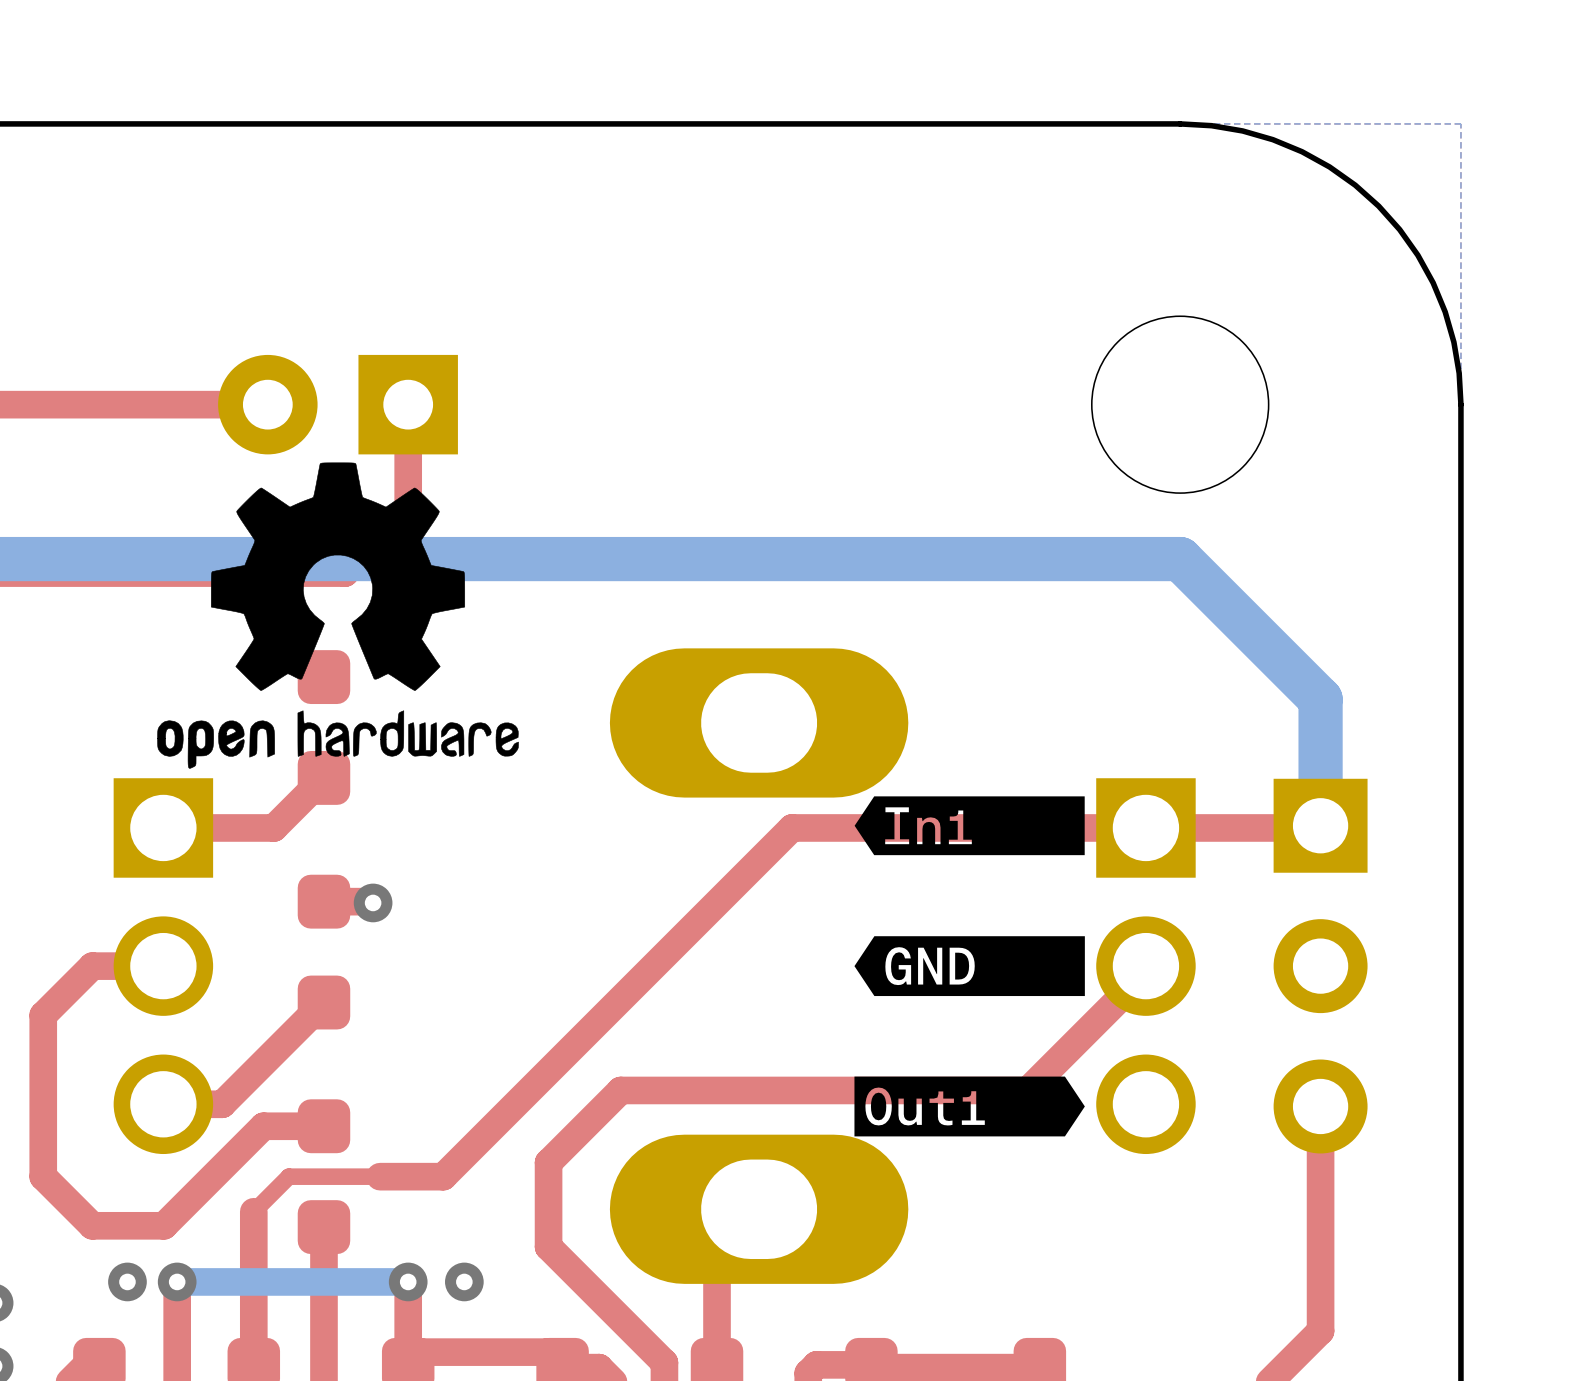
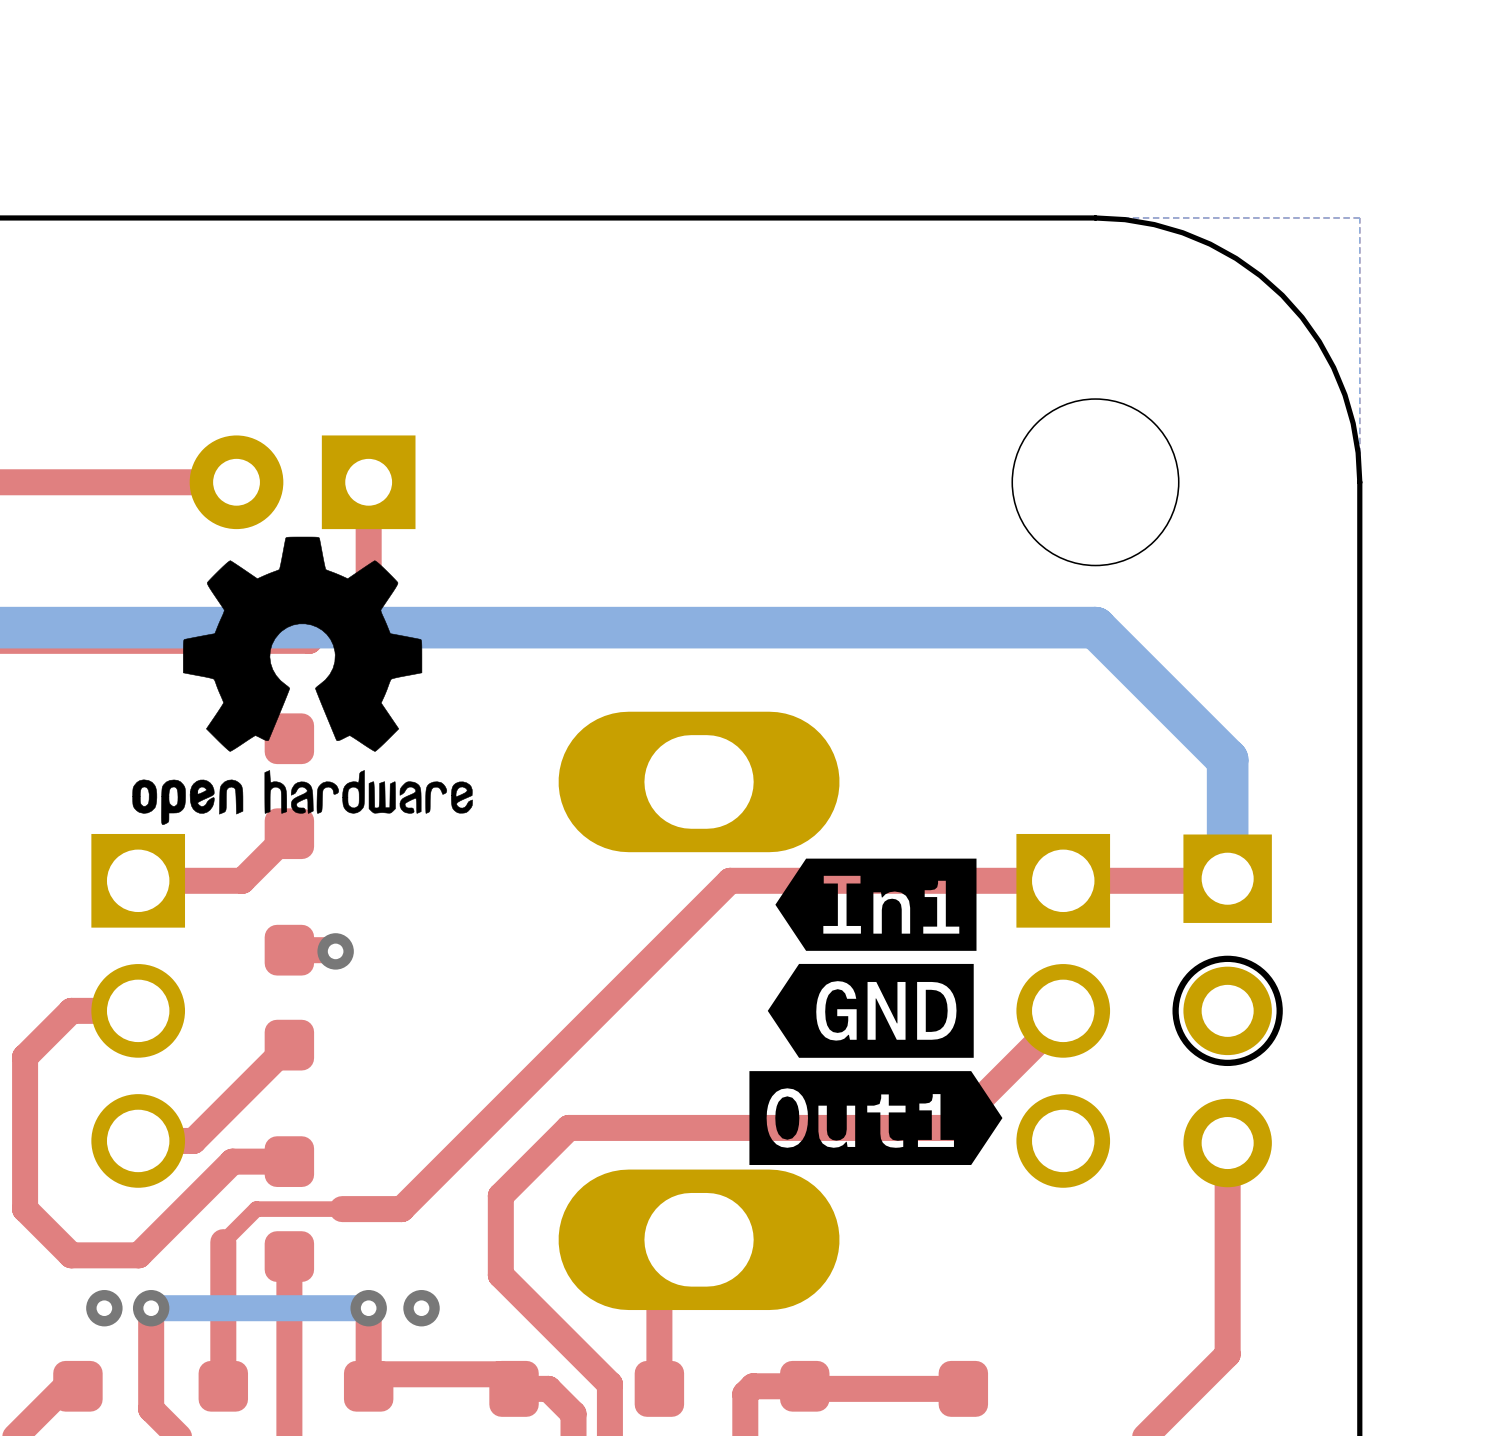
drawing shape: [854, 796, 1085, 856] -> [775, 858, 977, 951]
drawing: none -> [1172, 955, 1283, 1067]
drawing shape: [854, 936, 1085, 997] -> [767, 963, 974, 1058]
drawing shape: [854, 1076, 1085, 1137] -> [749, 1071, 1003, 1165]

